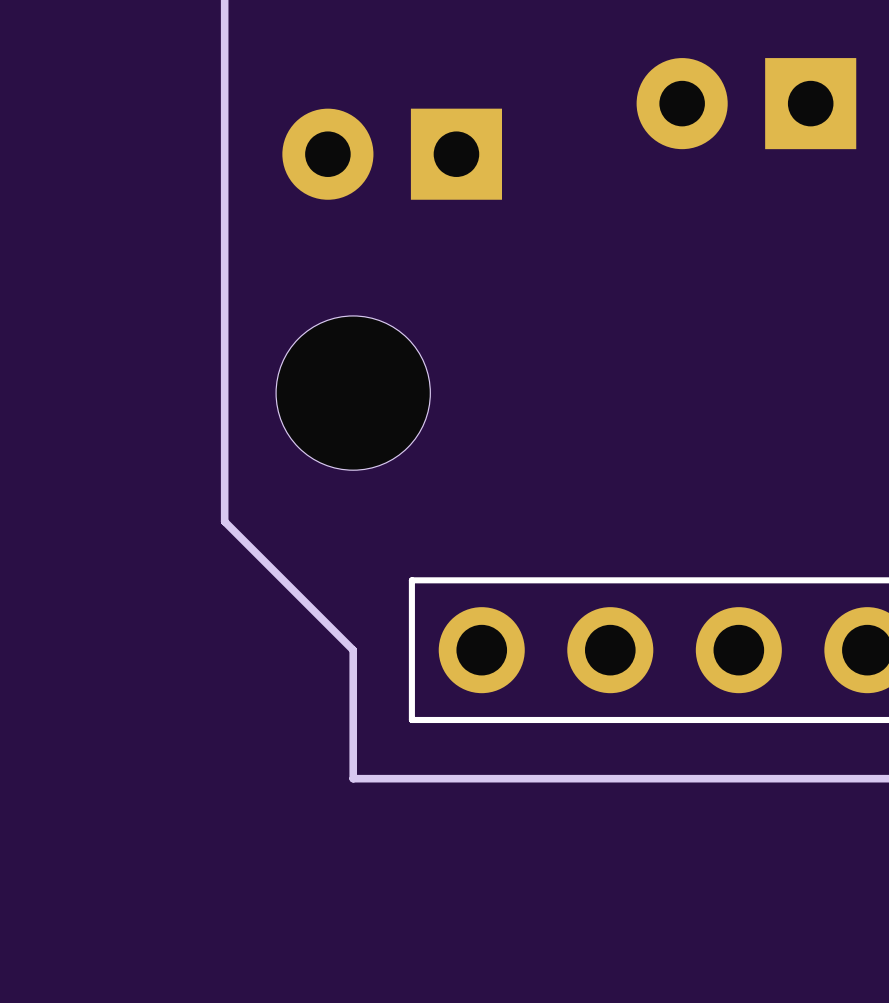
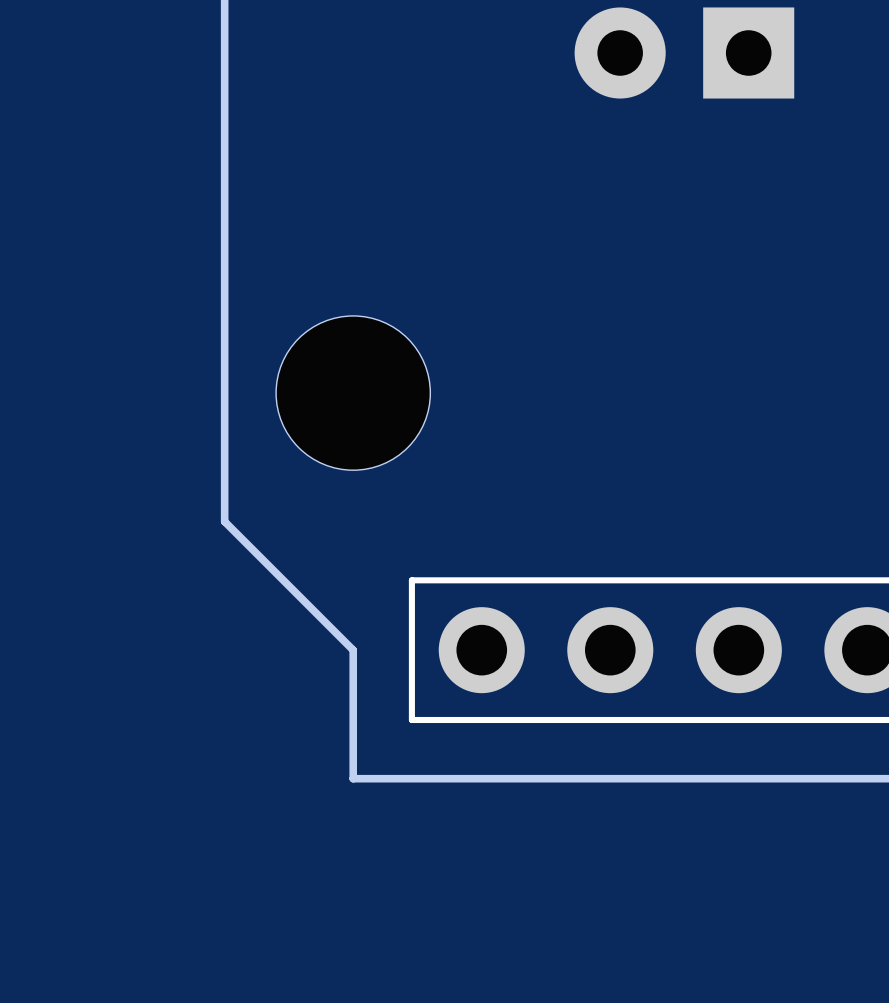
part position: (746, 103) -> (684, 53)
part: (392, 154) -> none

